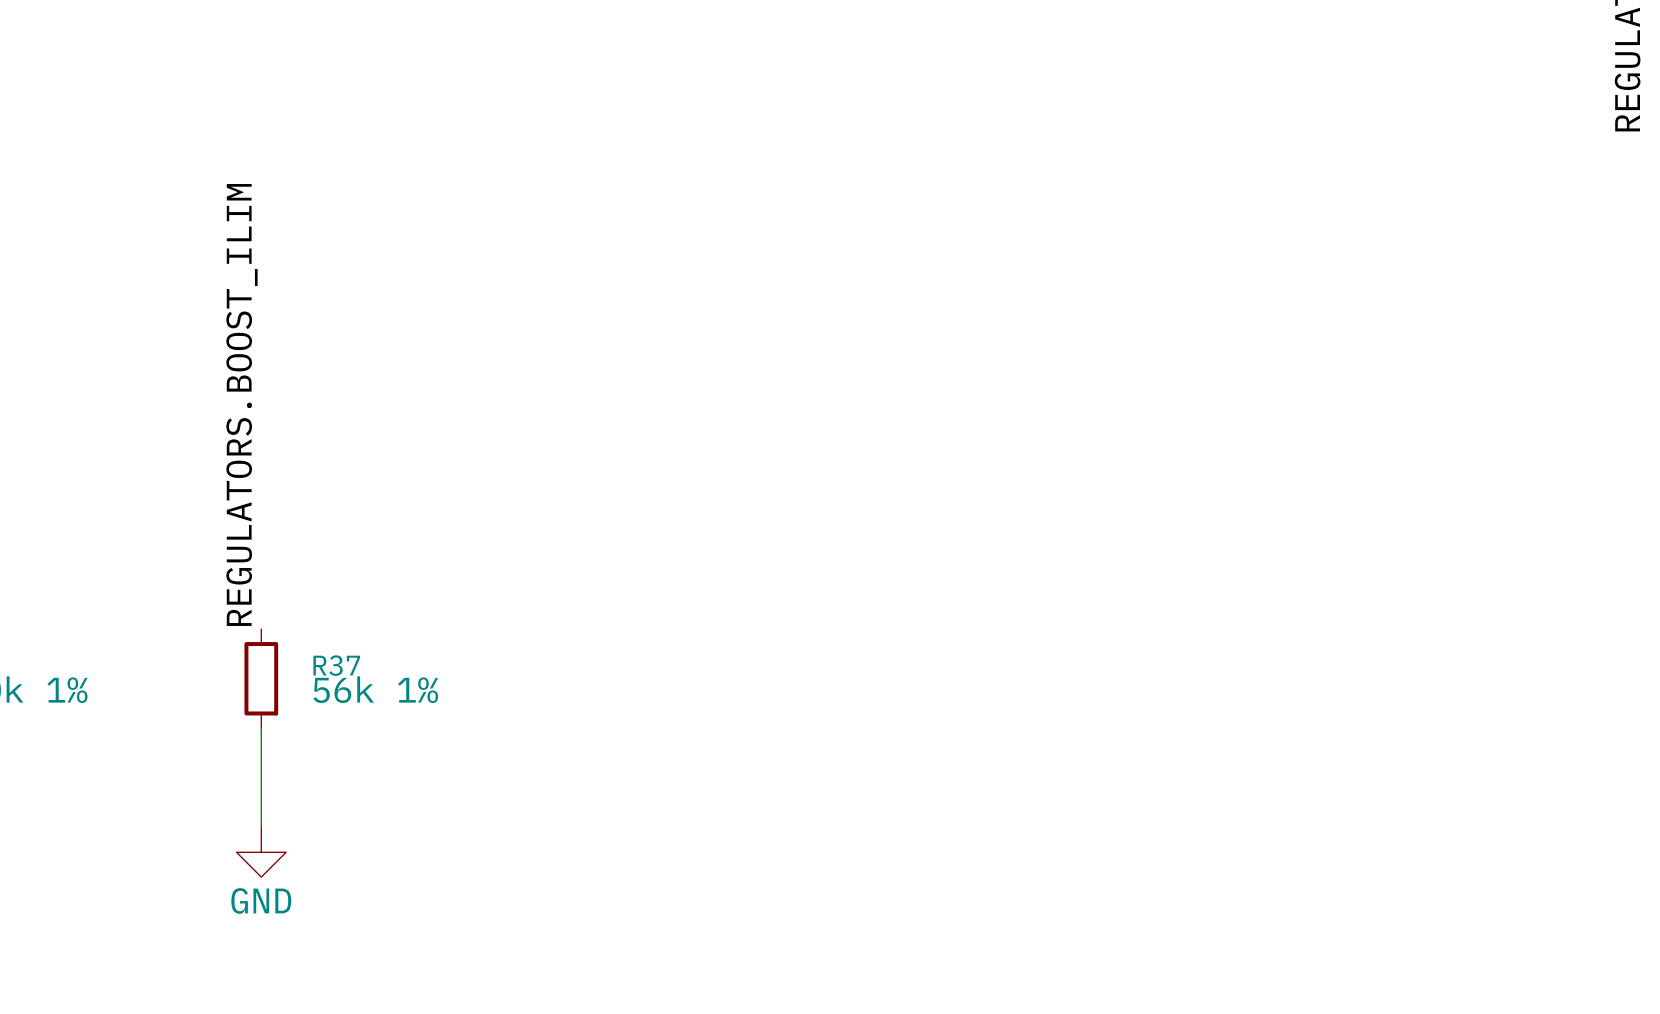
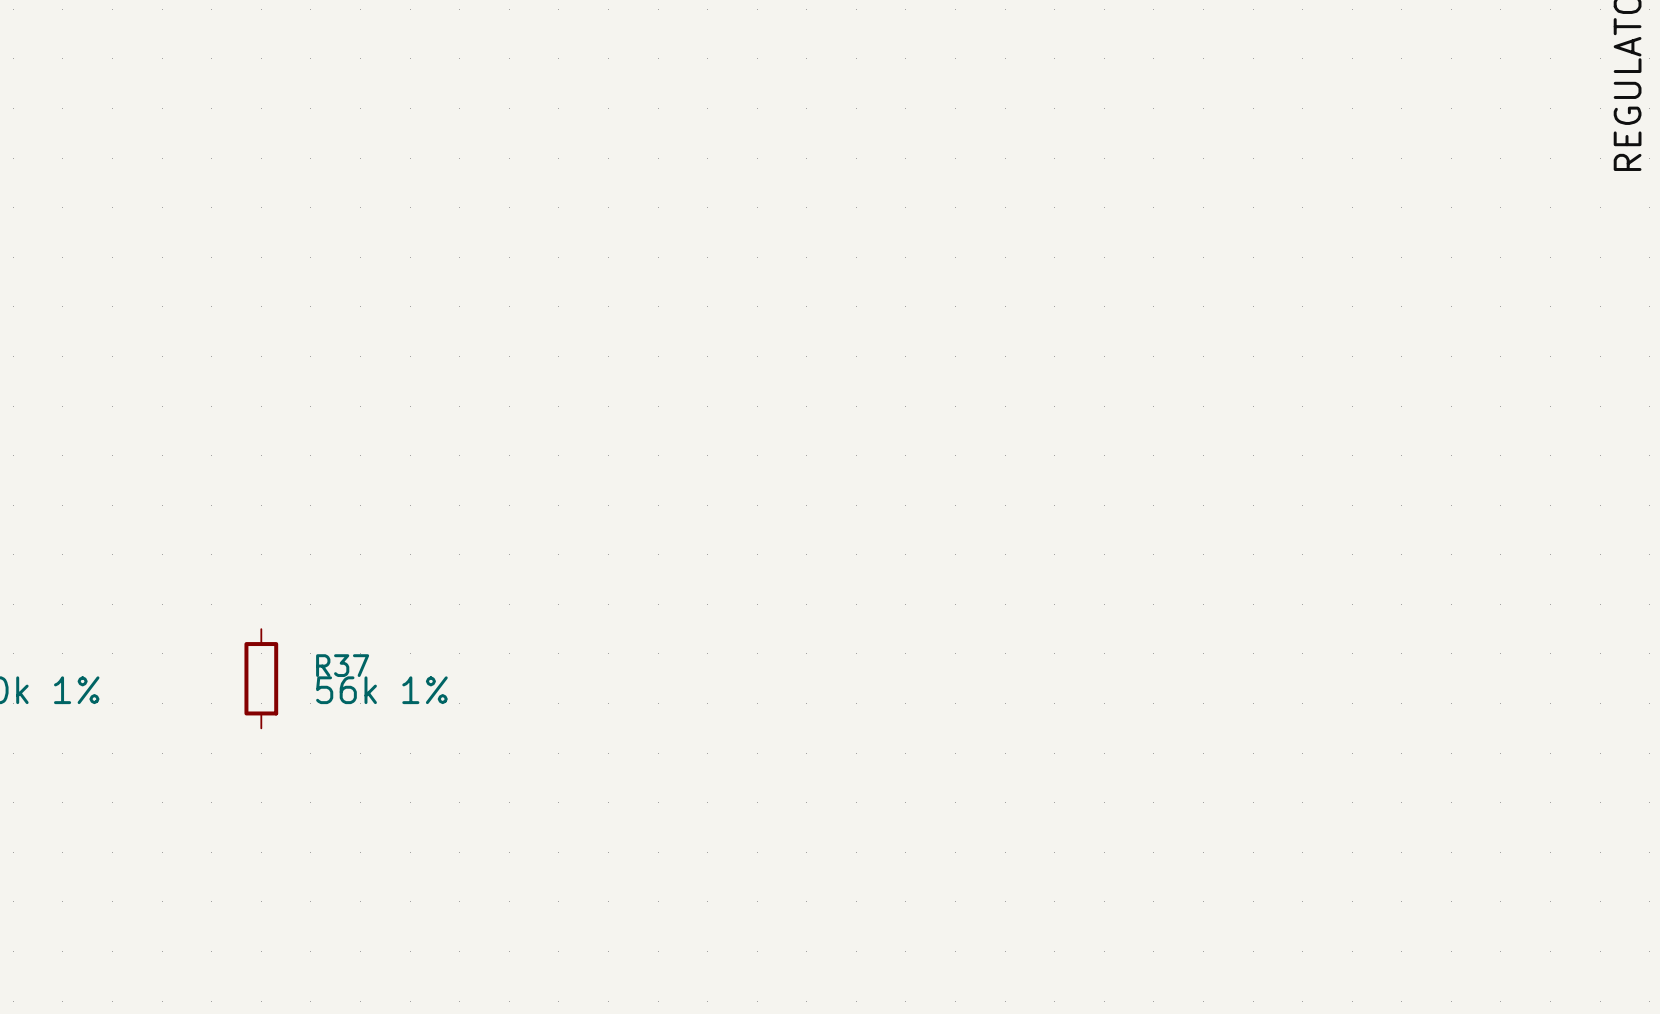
label: REGULATORS.BOOST_ILIM (241, 404) -> none
wire: (261, 728) (261, 827) -> none
power symbol: GND (261, 852) -> none

